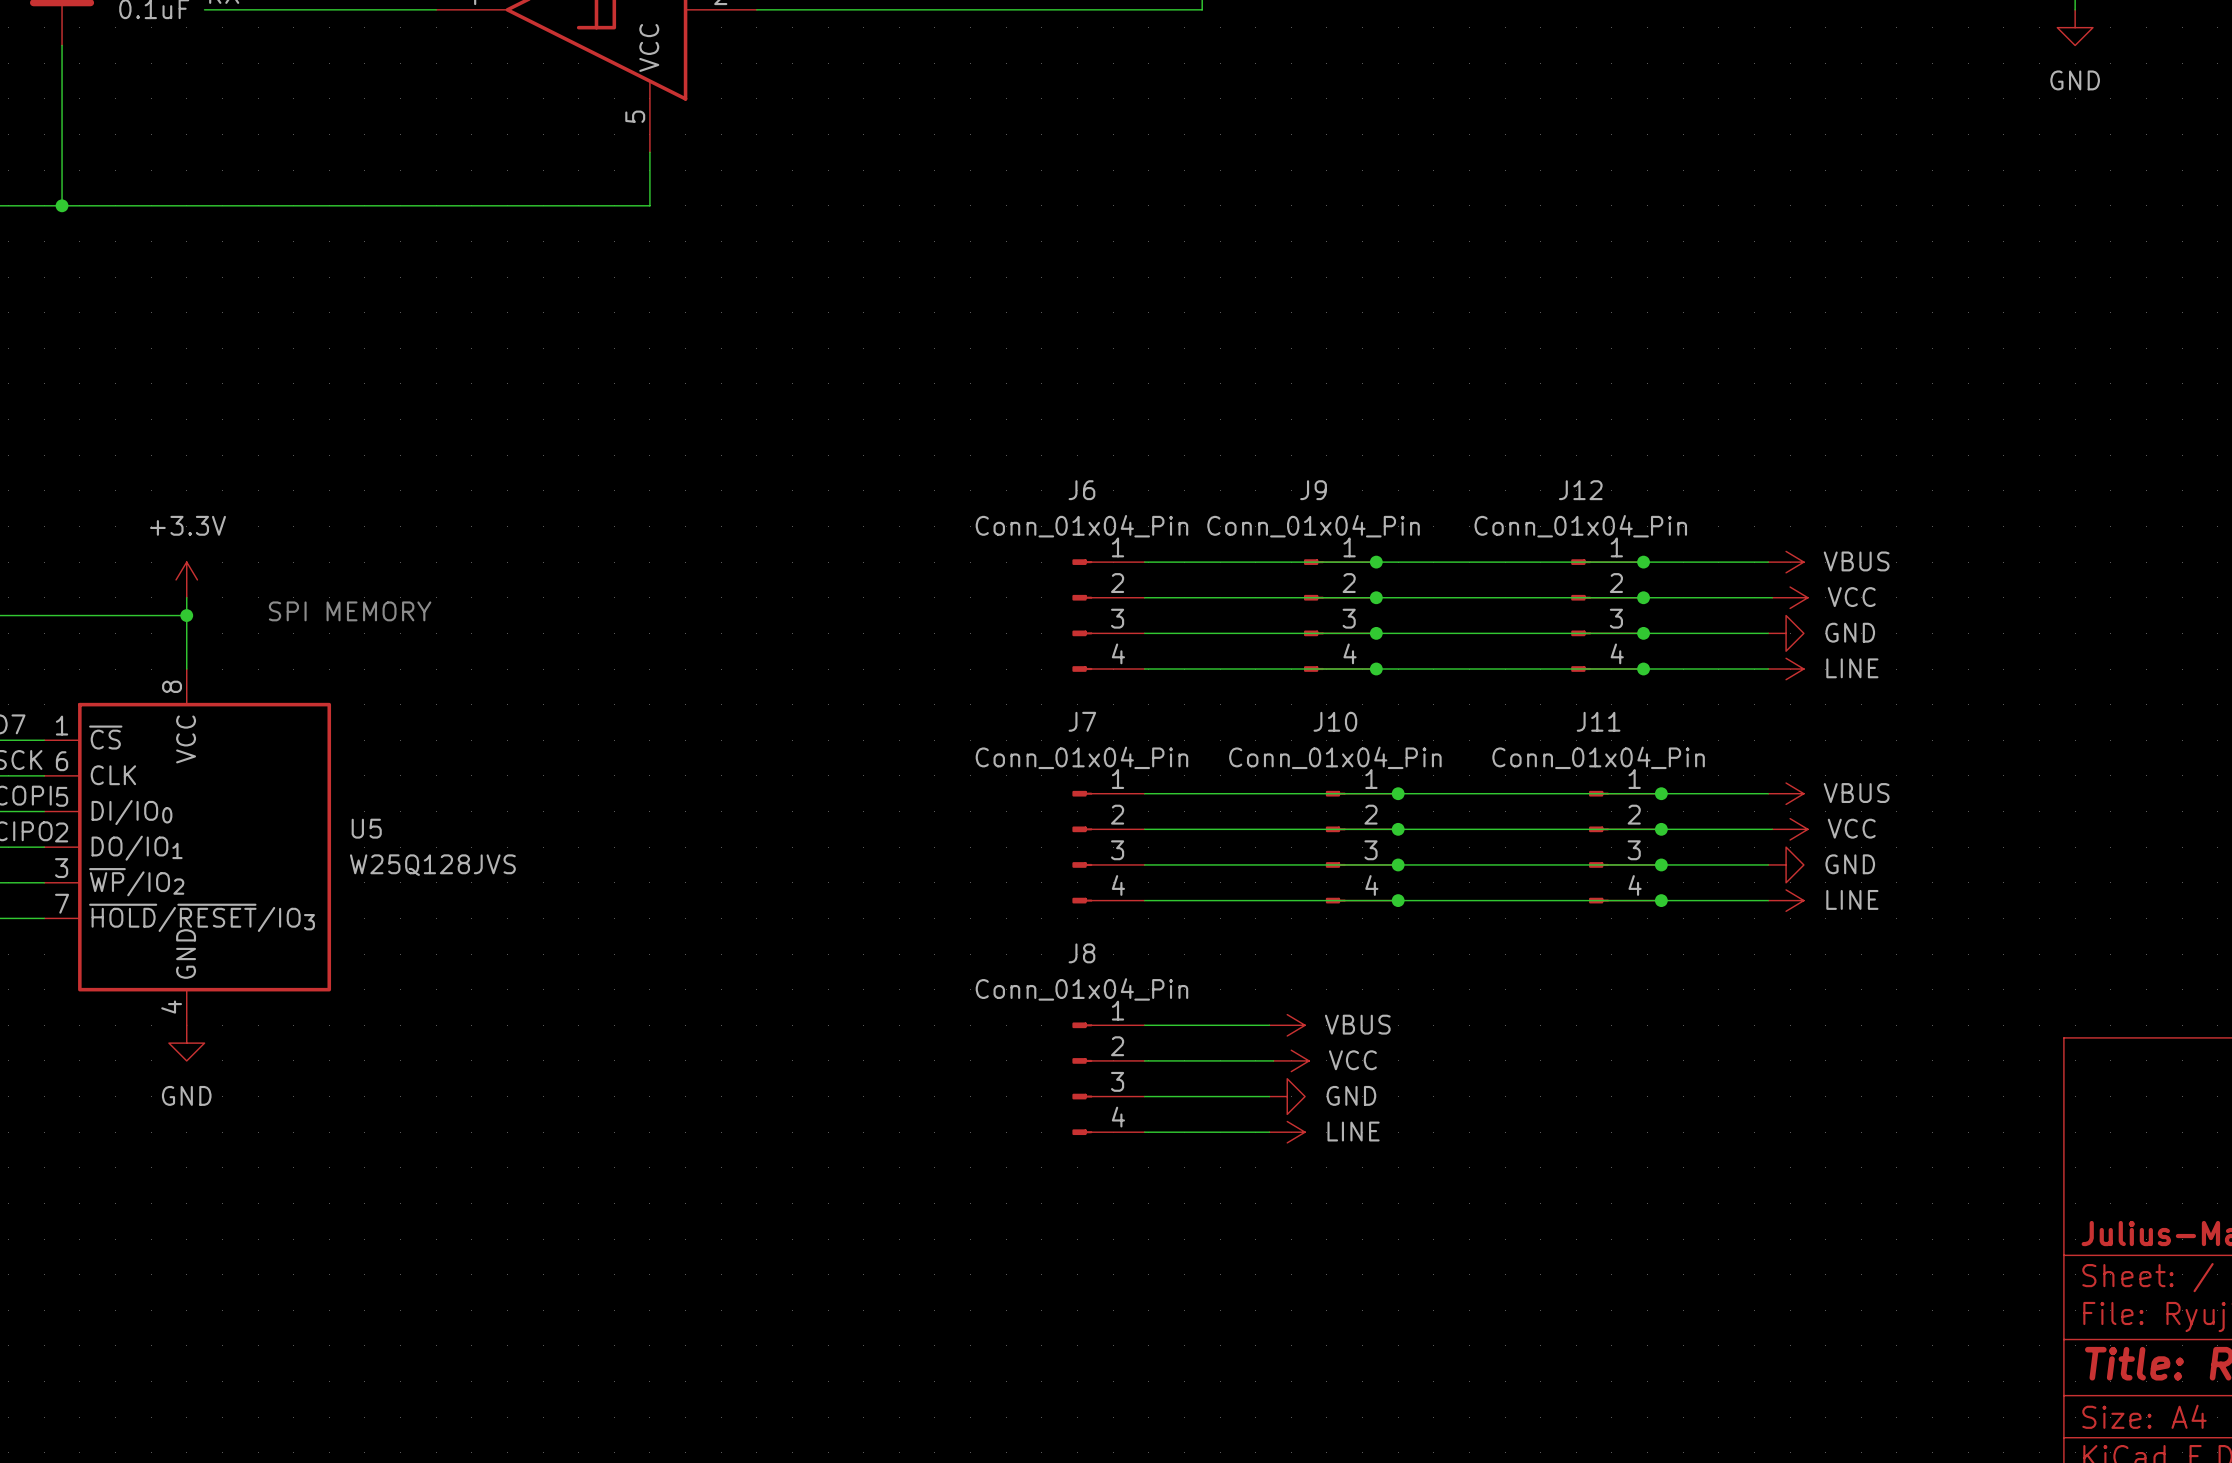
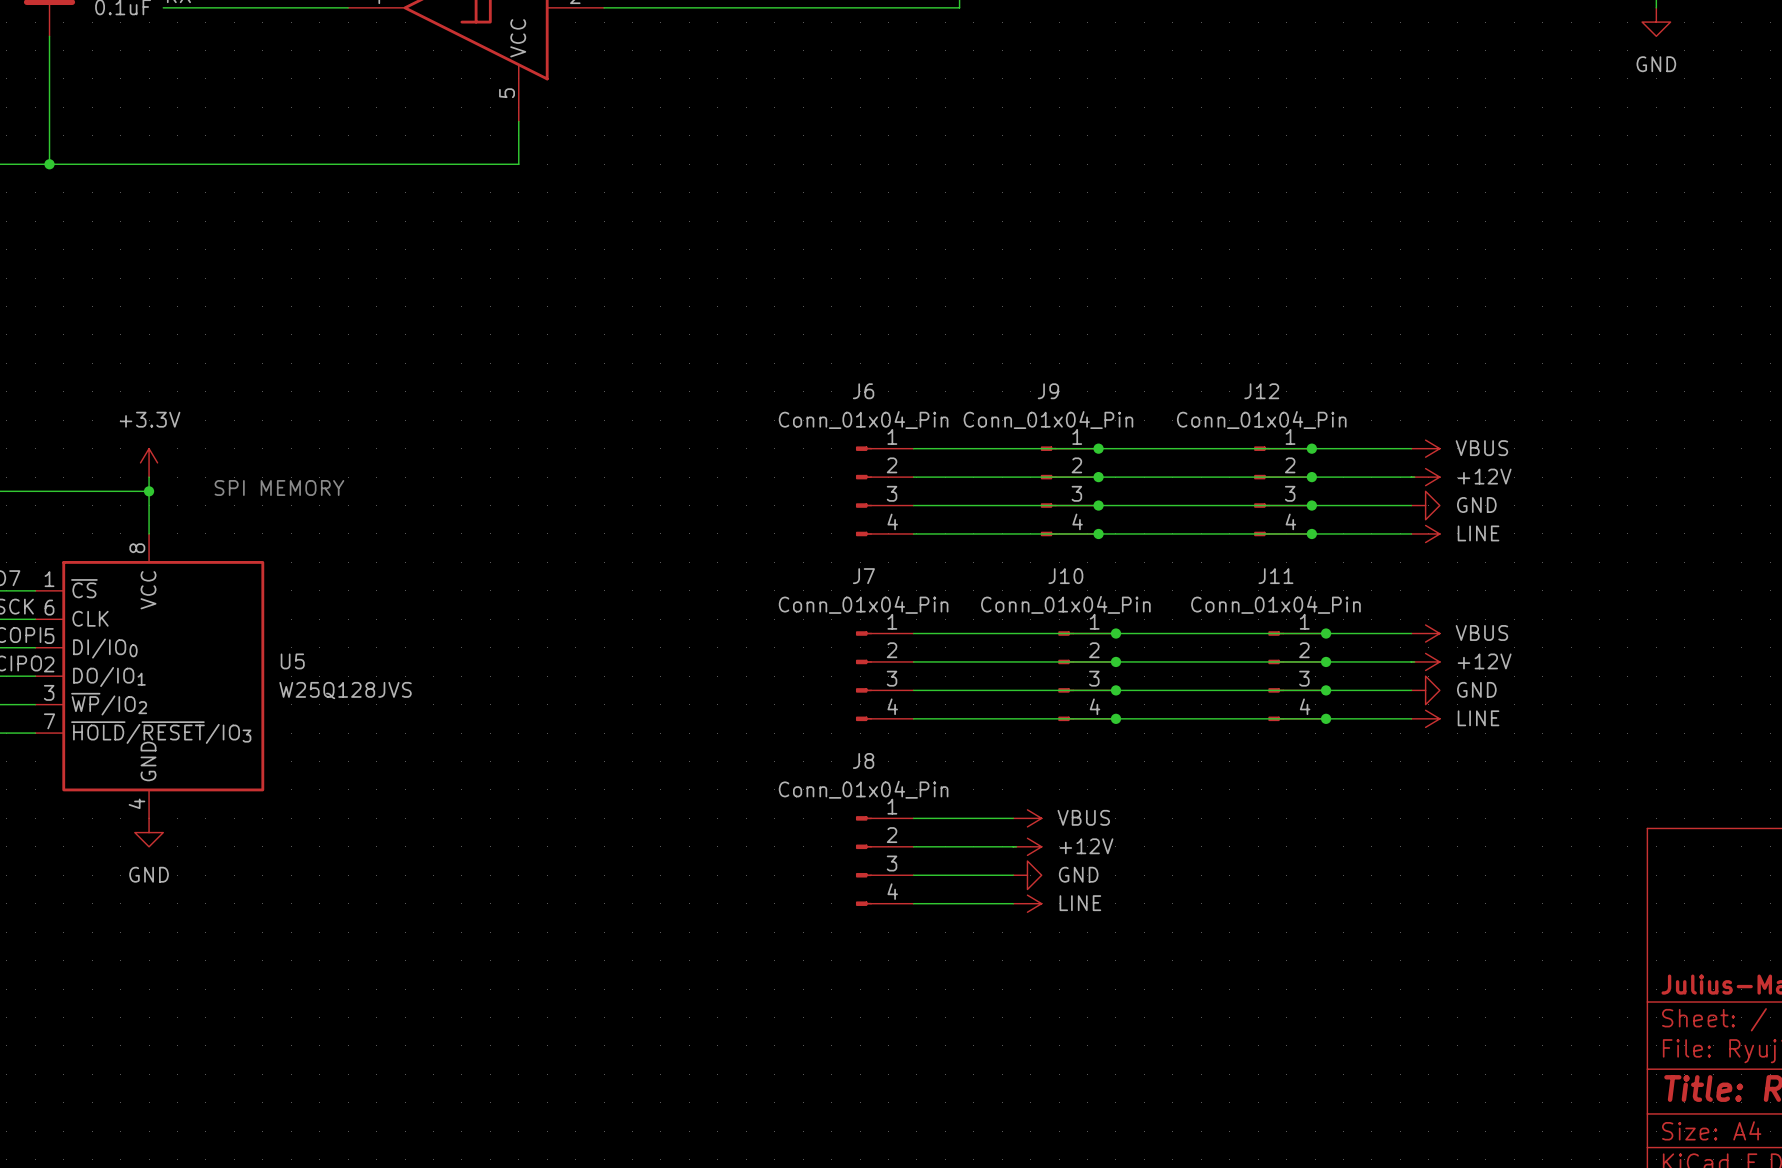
power symbol: VCC (1790, 597) -> +12V (1425, 477)
power symbol: VCC (1790, 829) -> +12V (1425, 661)
power symbol: VCC (1291, 1060) -> +12V (1027, 846)

